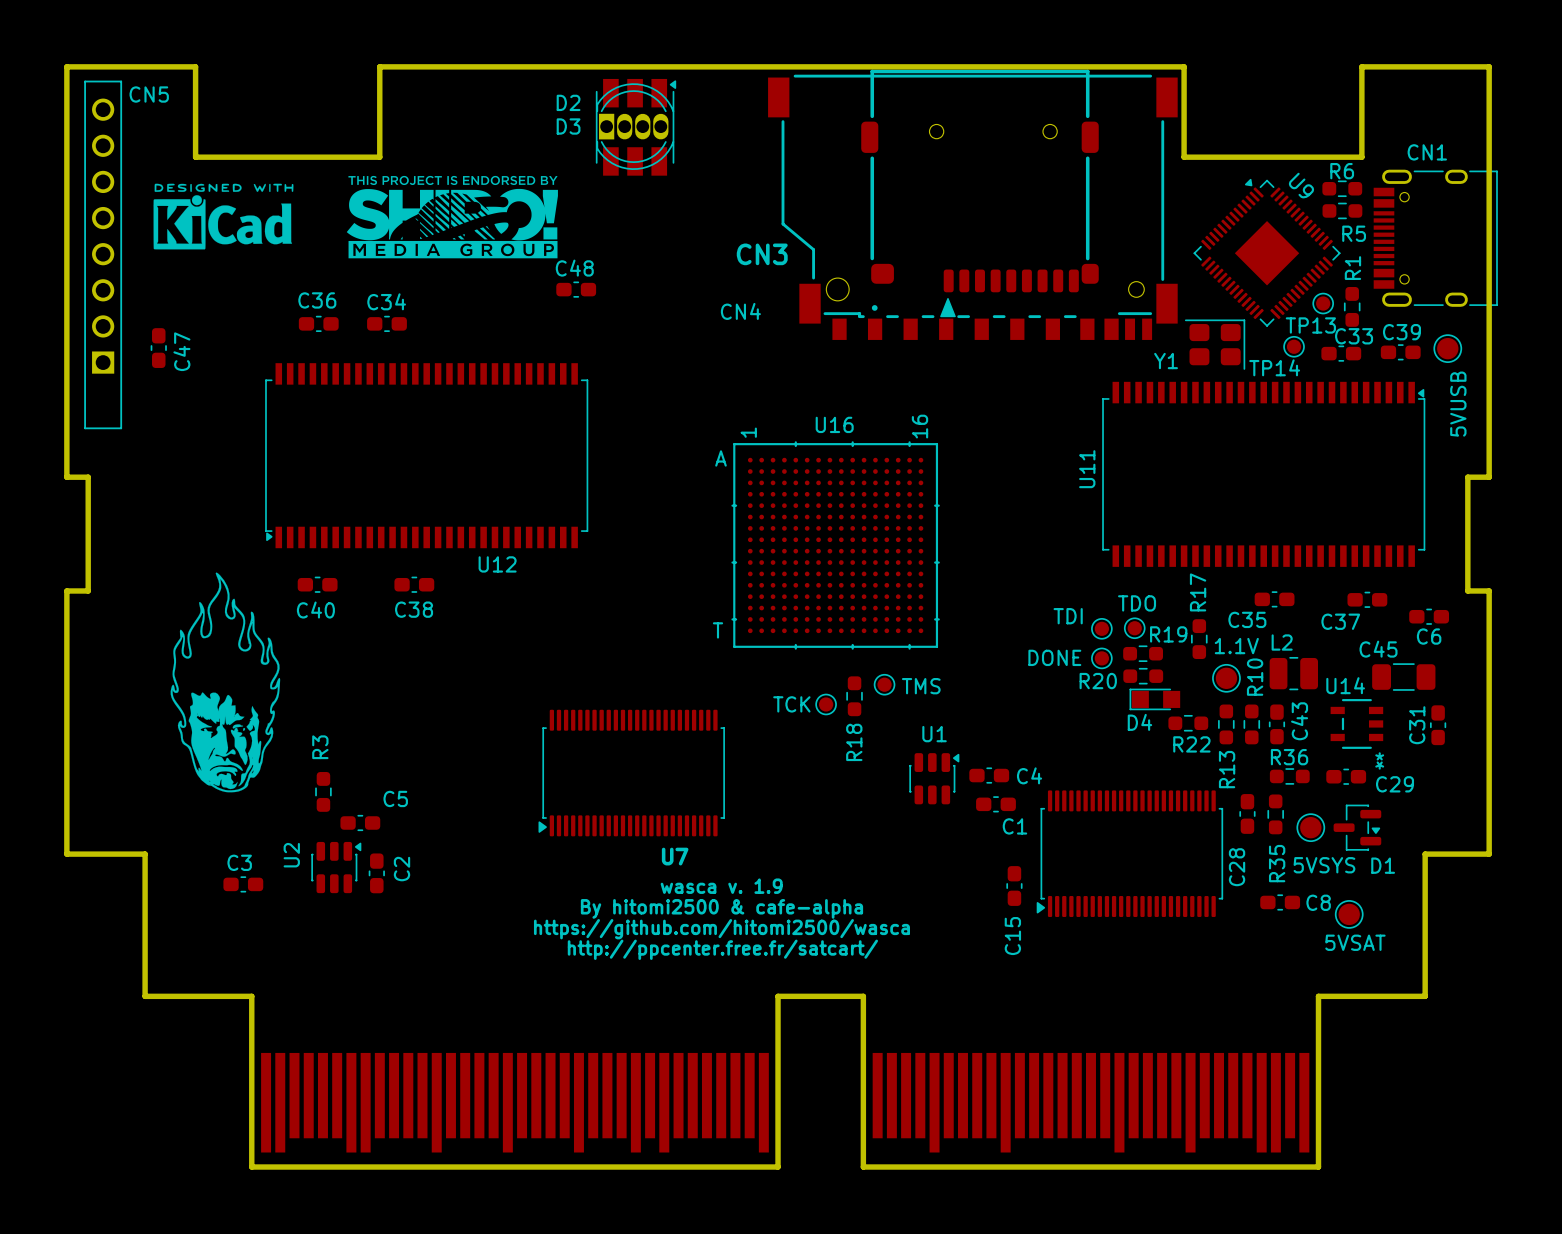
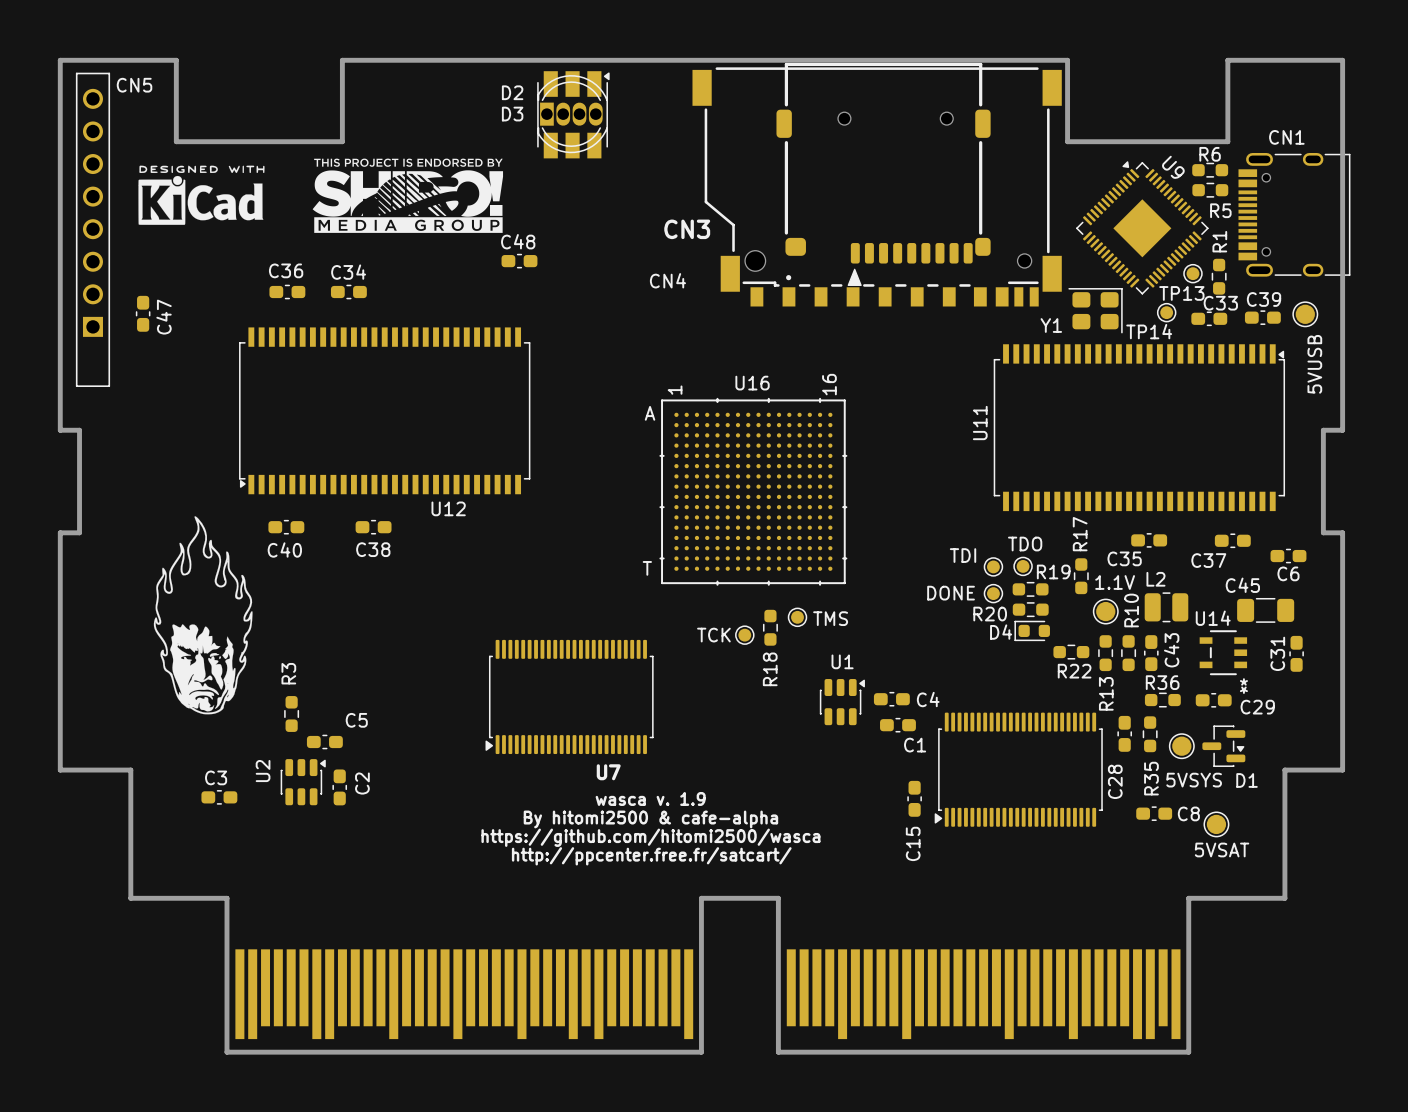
D4 footprint: [1129, 688, 1181, 711] -> [1014, 620, 1050, 642]
D4 name position: D4 (1139, 722) -> D4 (1001, 632)

